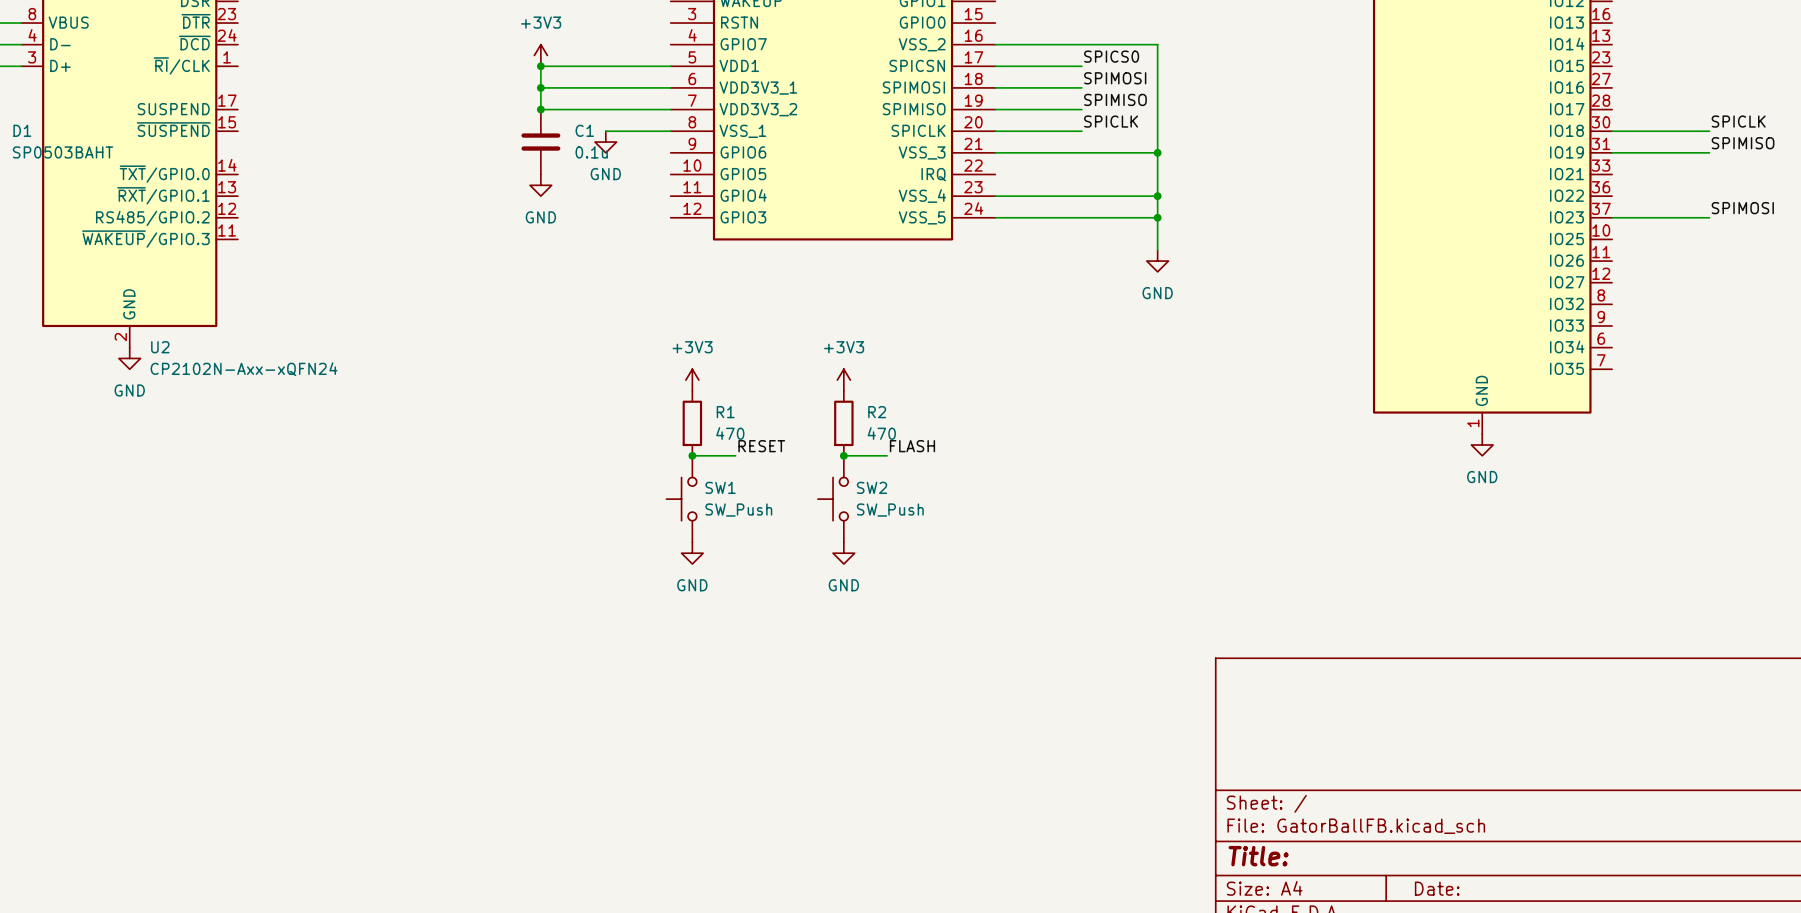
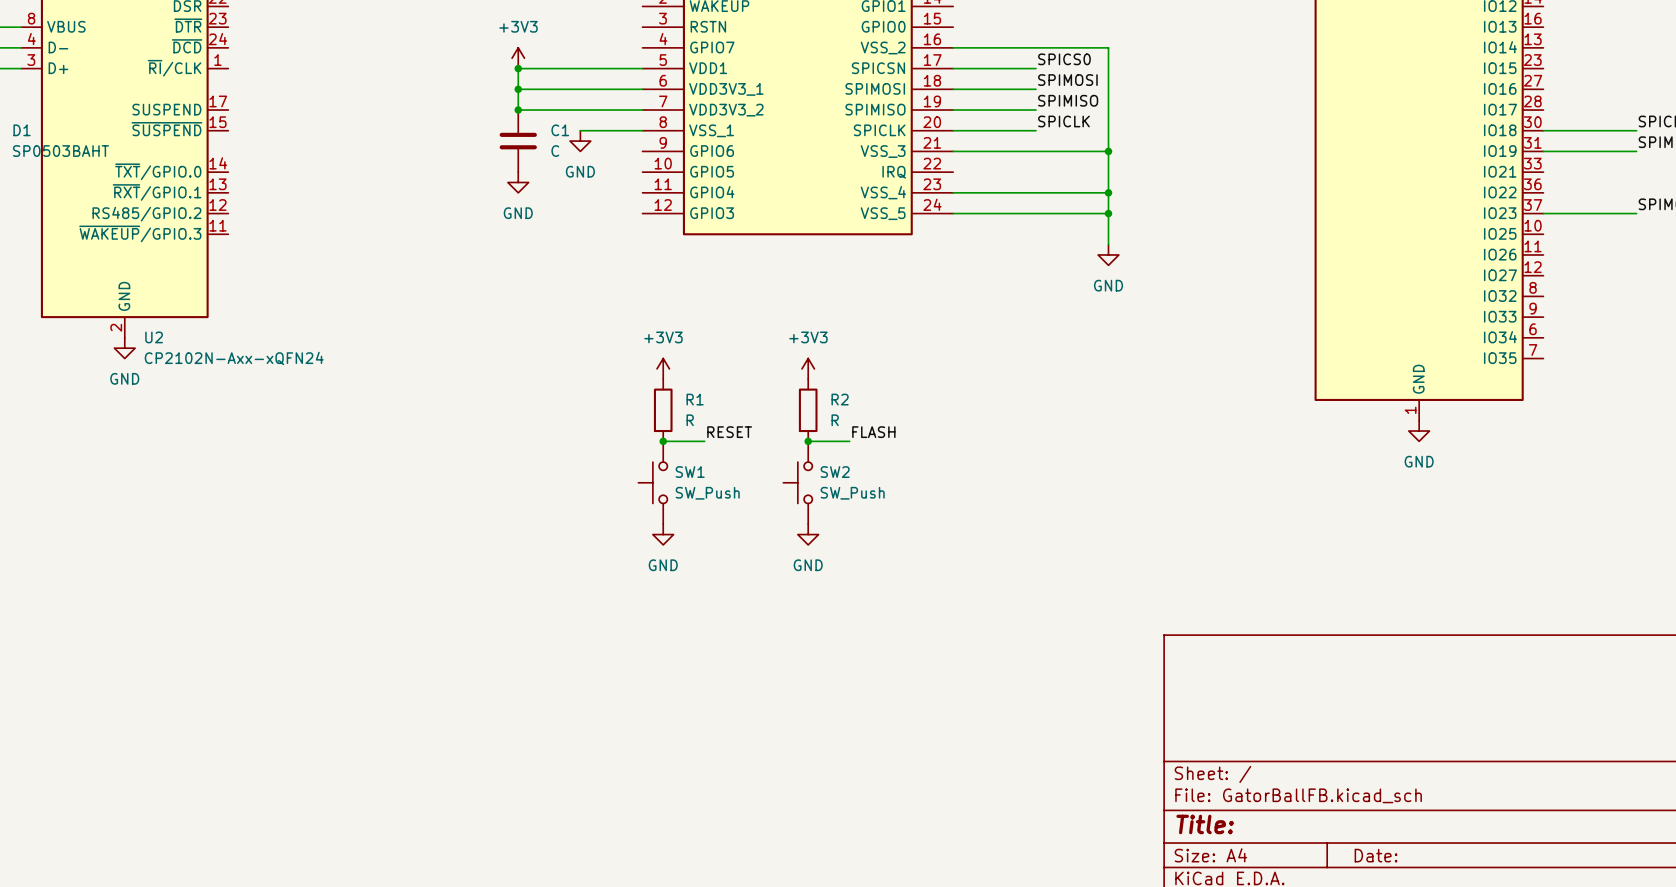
C1 value: 0.1u (591, 152) -> C (555, 151)
R1 value: 470 (730, 433) -> R (690, 420)
R2 value: 470 (881, 433) -> R (835, 420)

